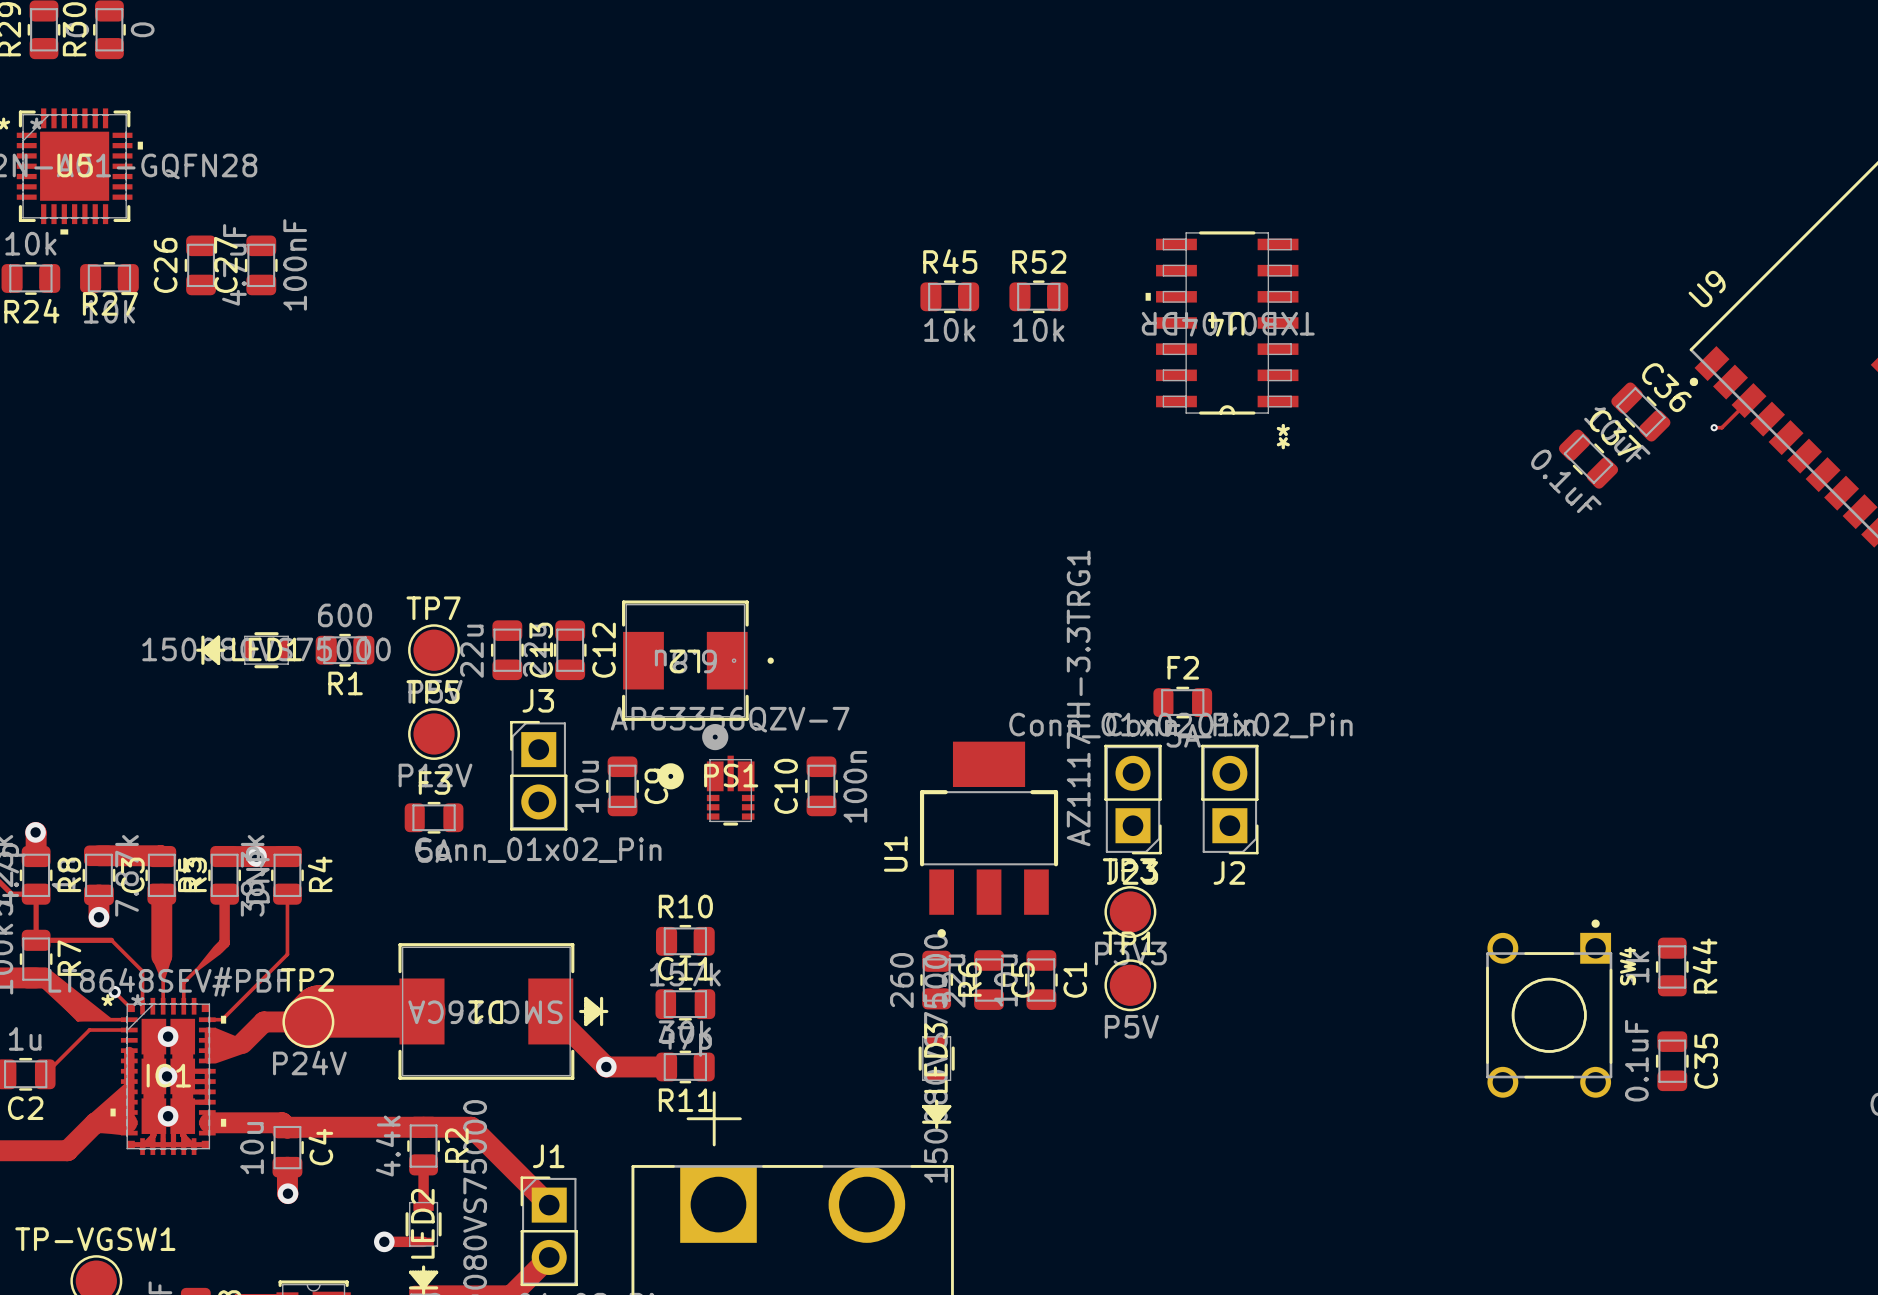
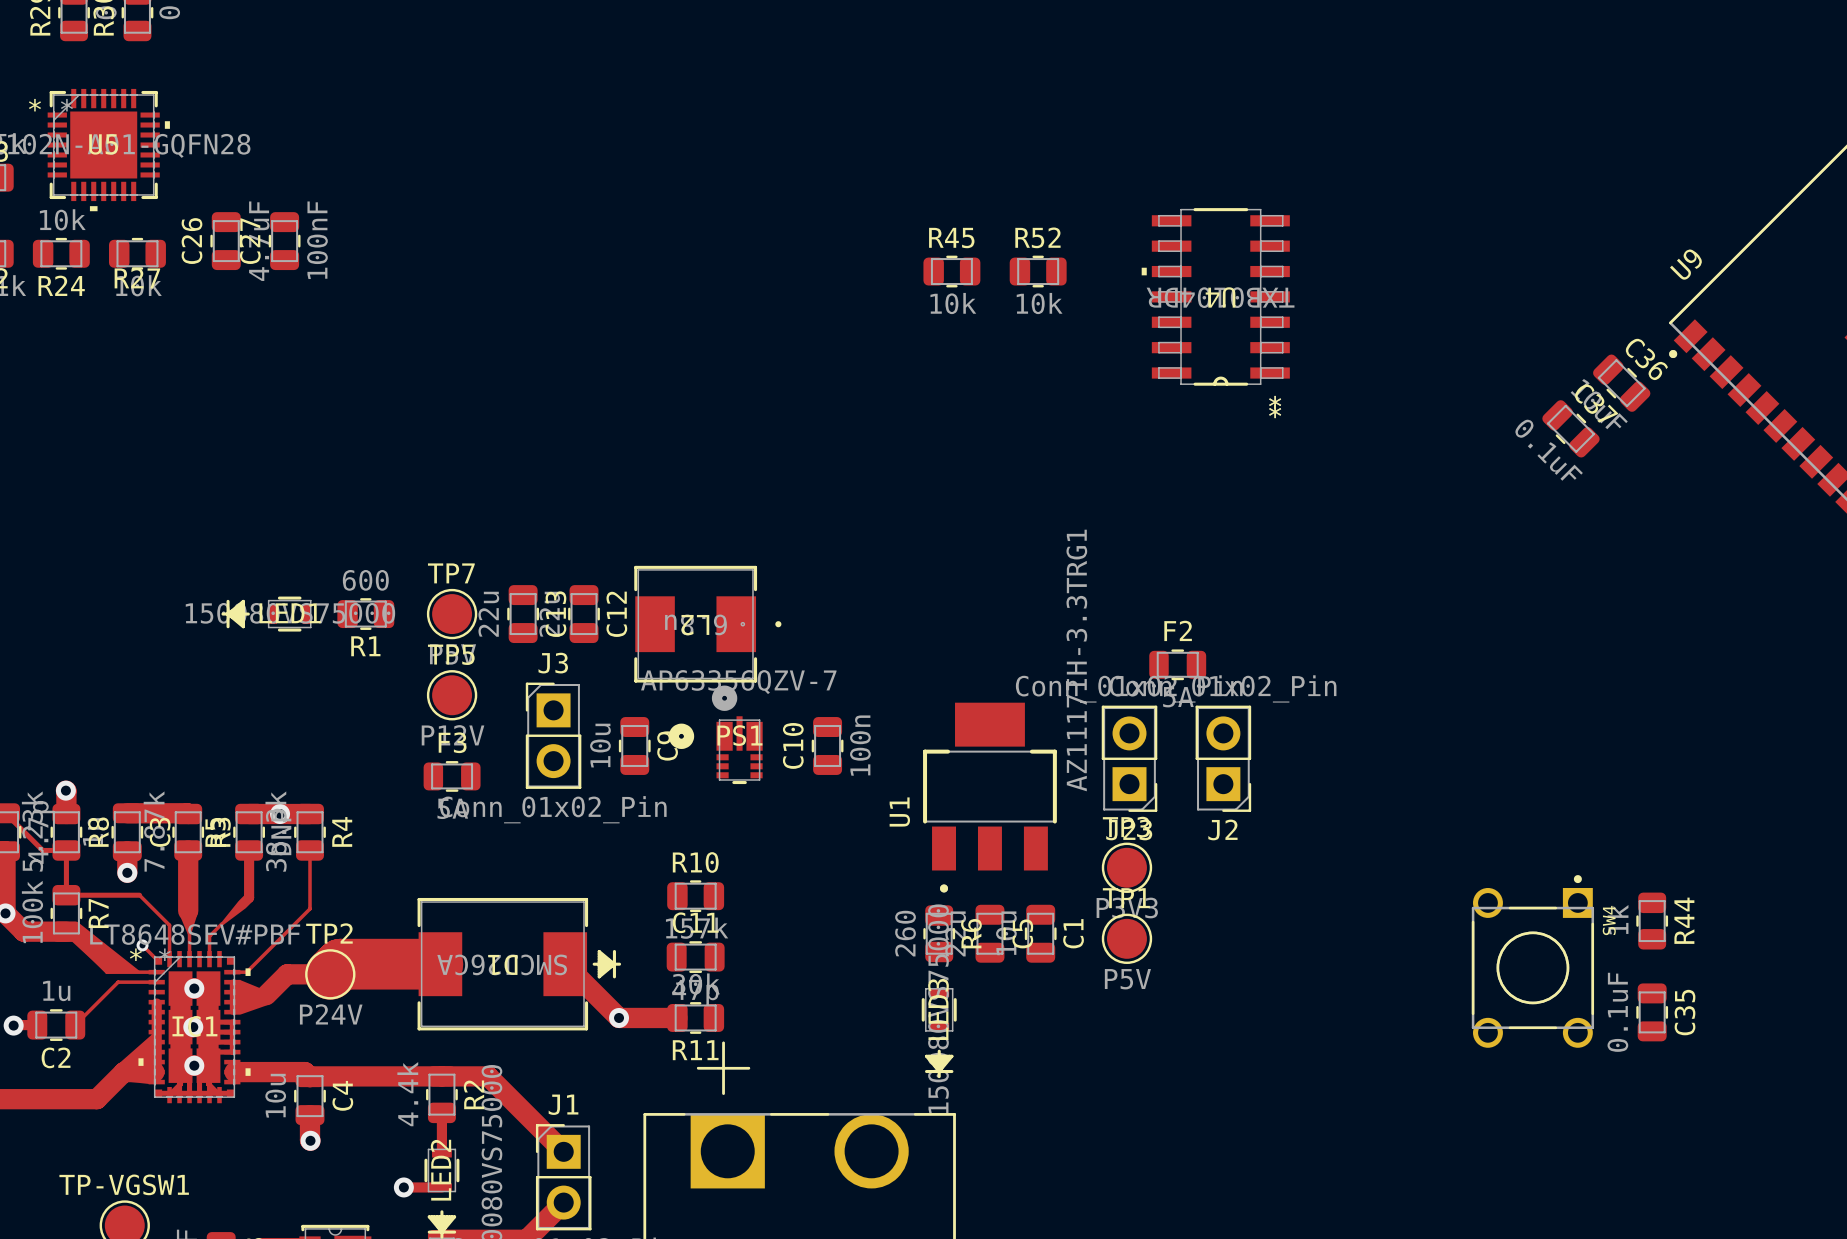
track: (1749, 400) (1721, 427) (1714, 427) -> none
via: (1714, 427) -> none

